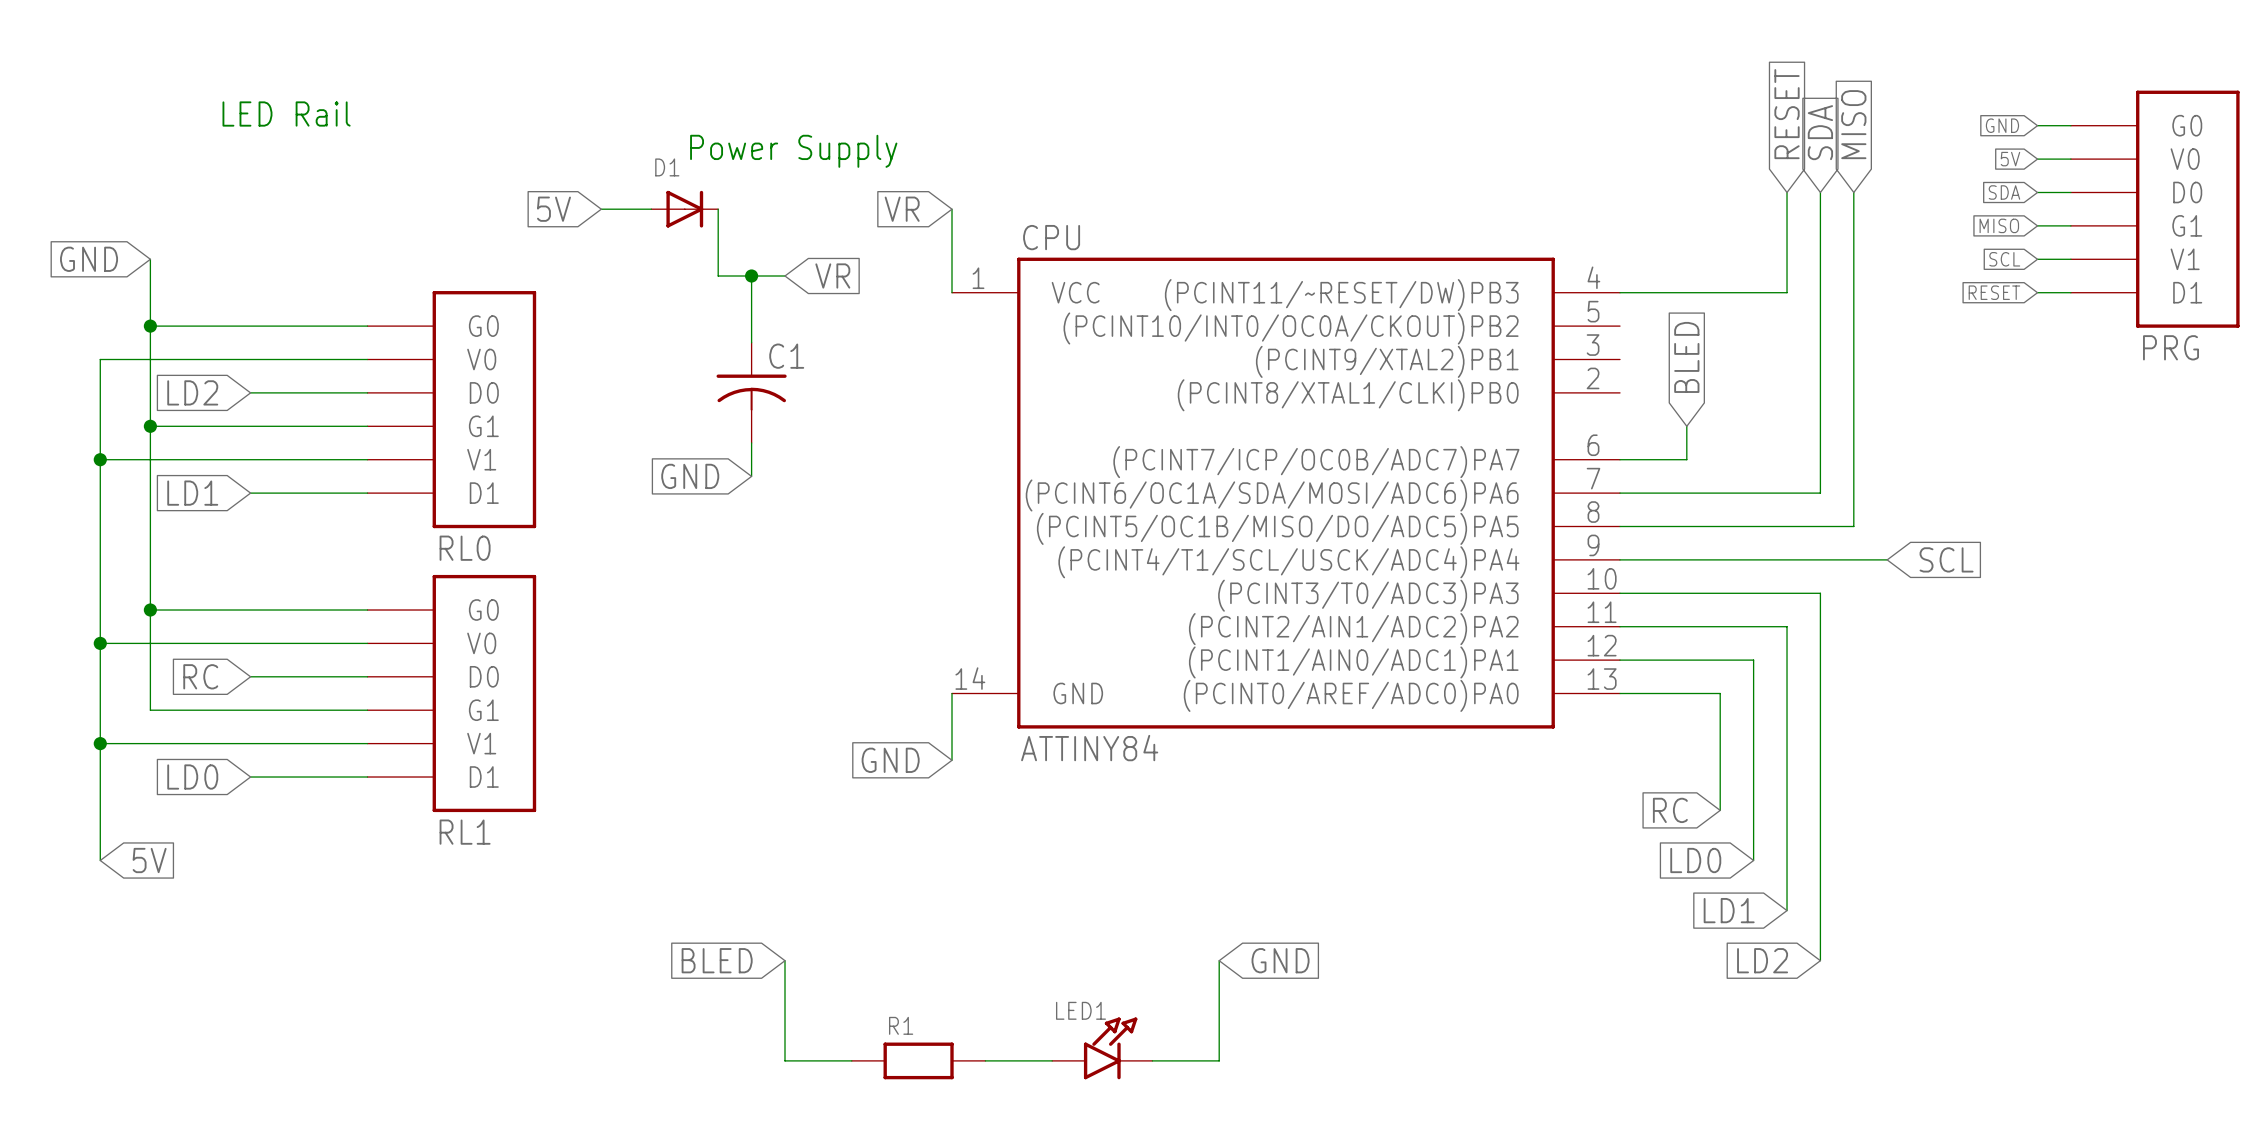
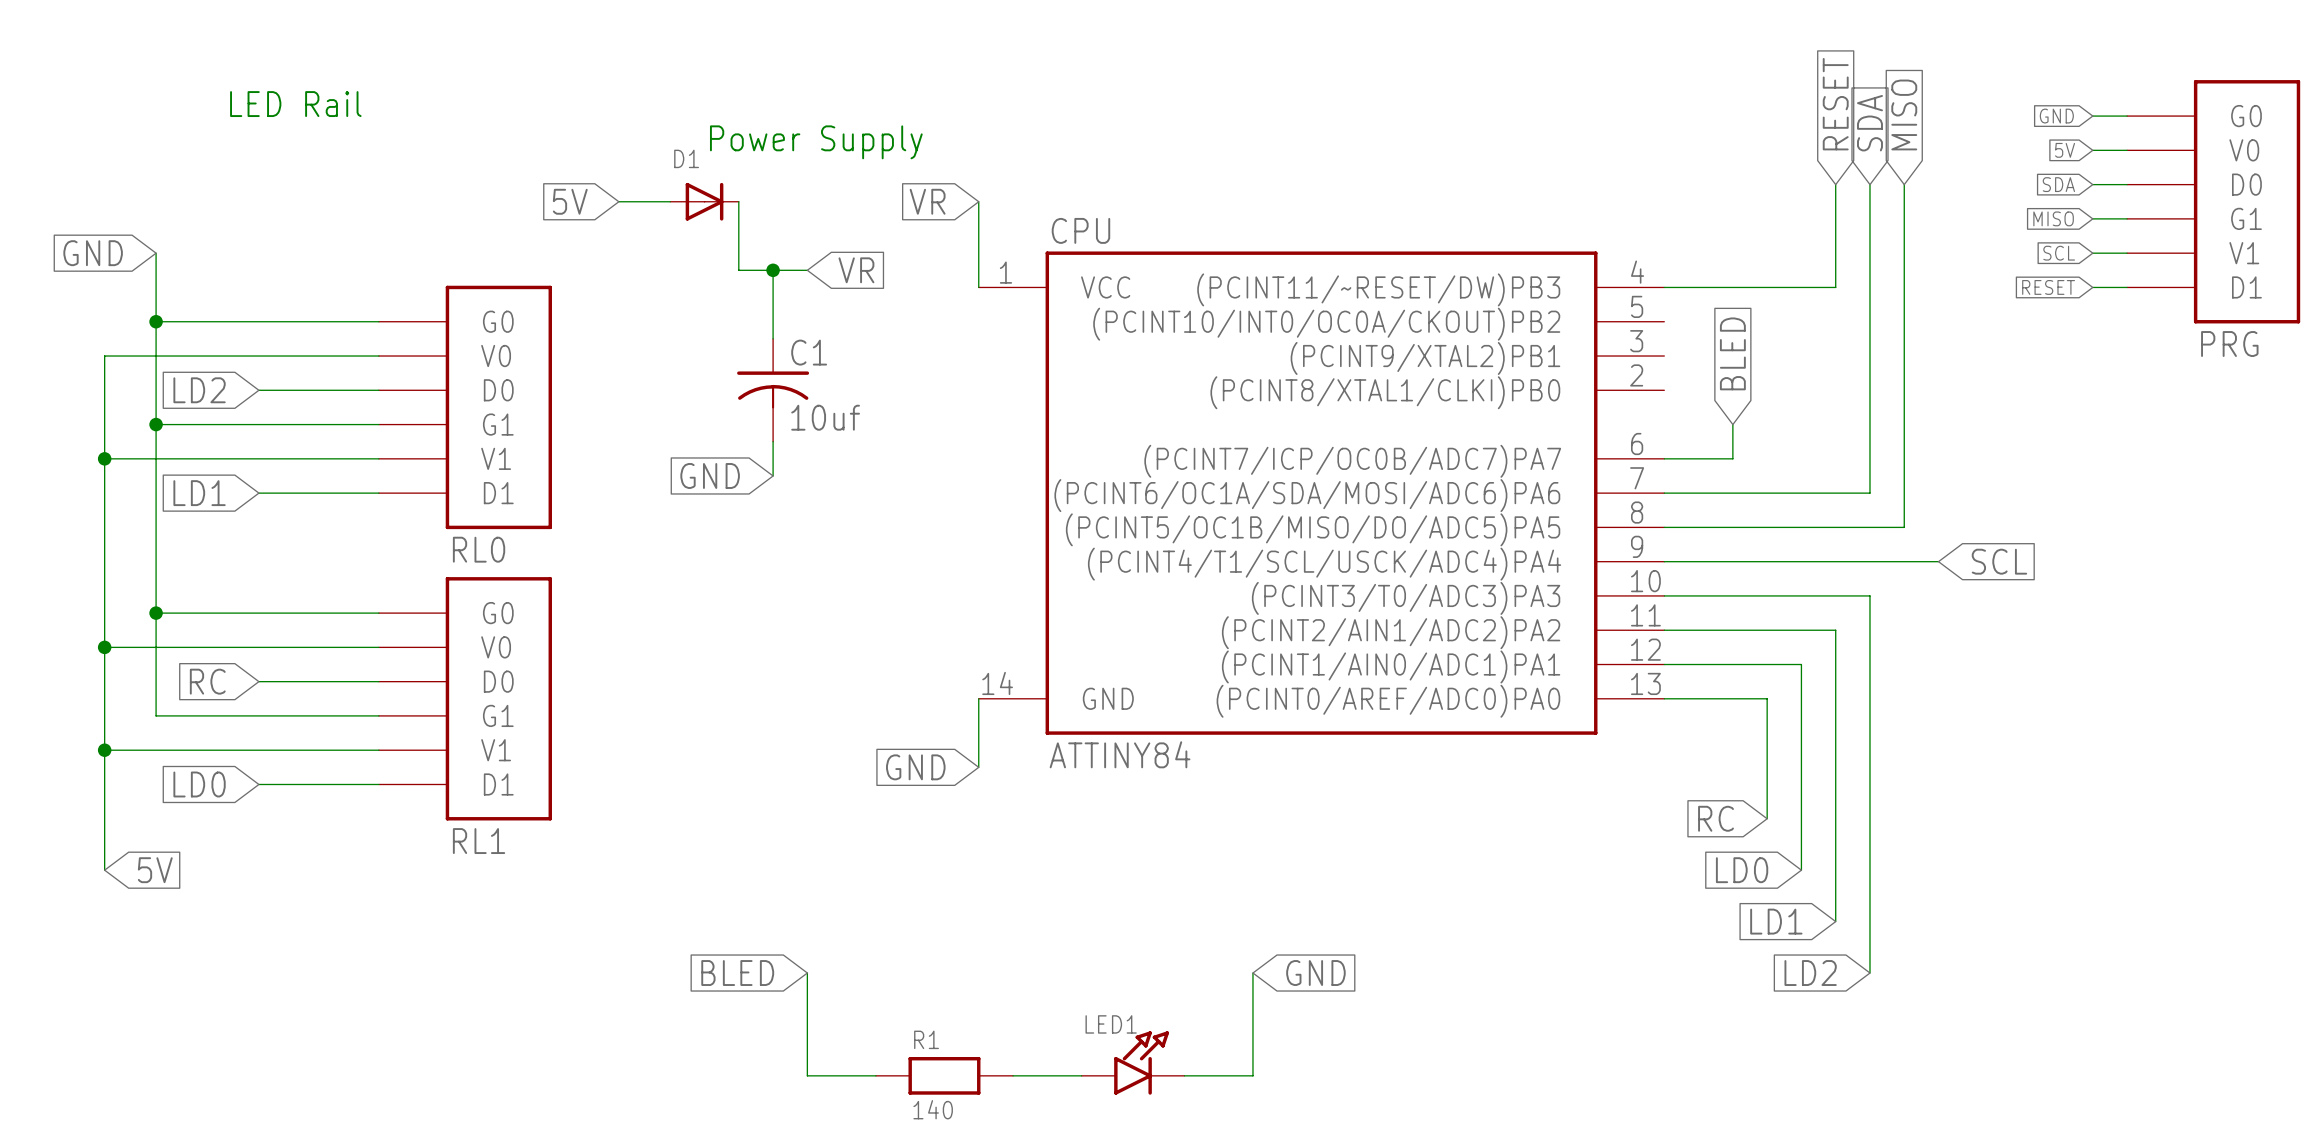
C1 value: none -> 10uf (825, 417)
R1 value: none -> 140 (933, 1109)

